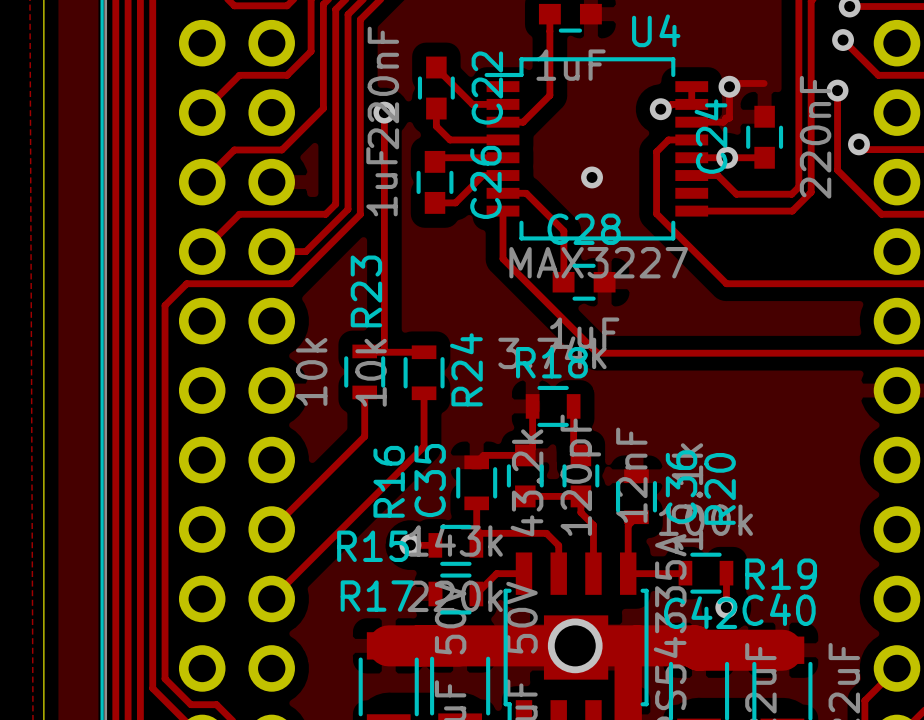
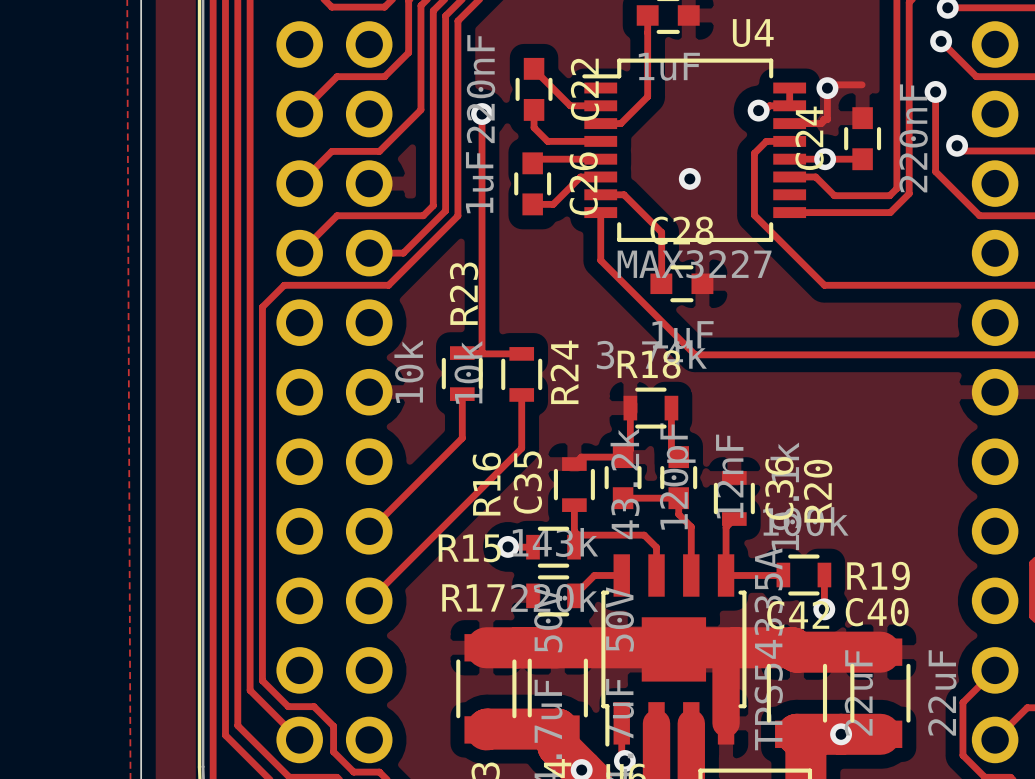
via: (575, 645) -> none

